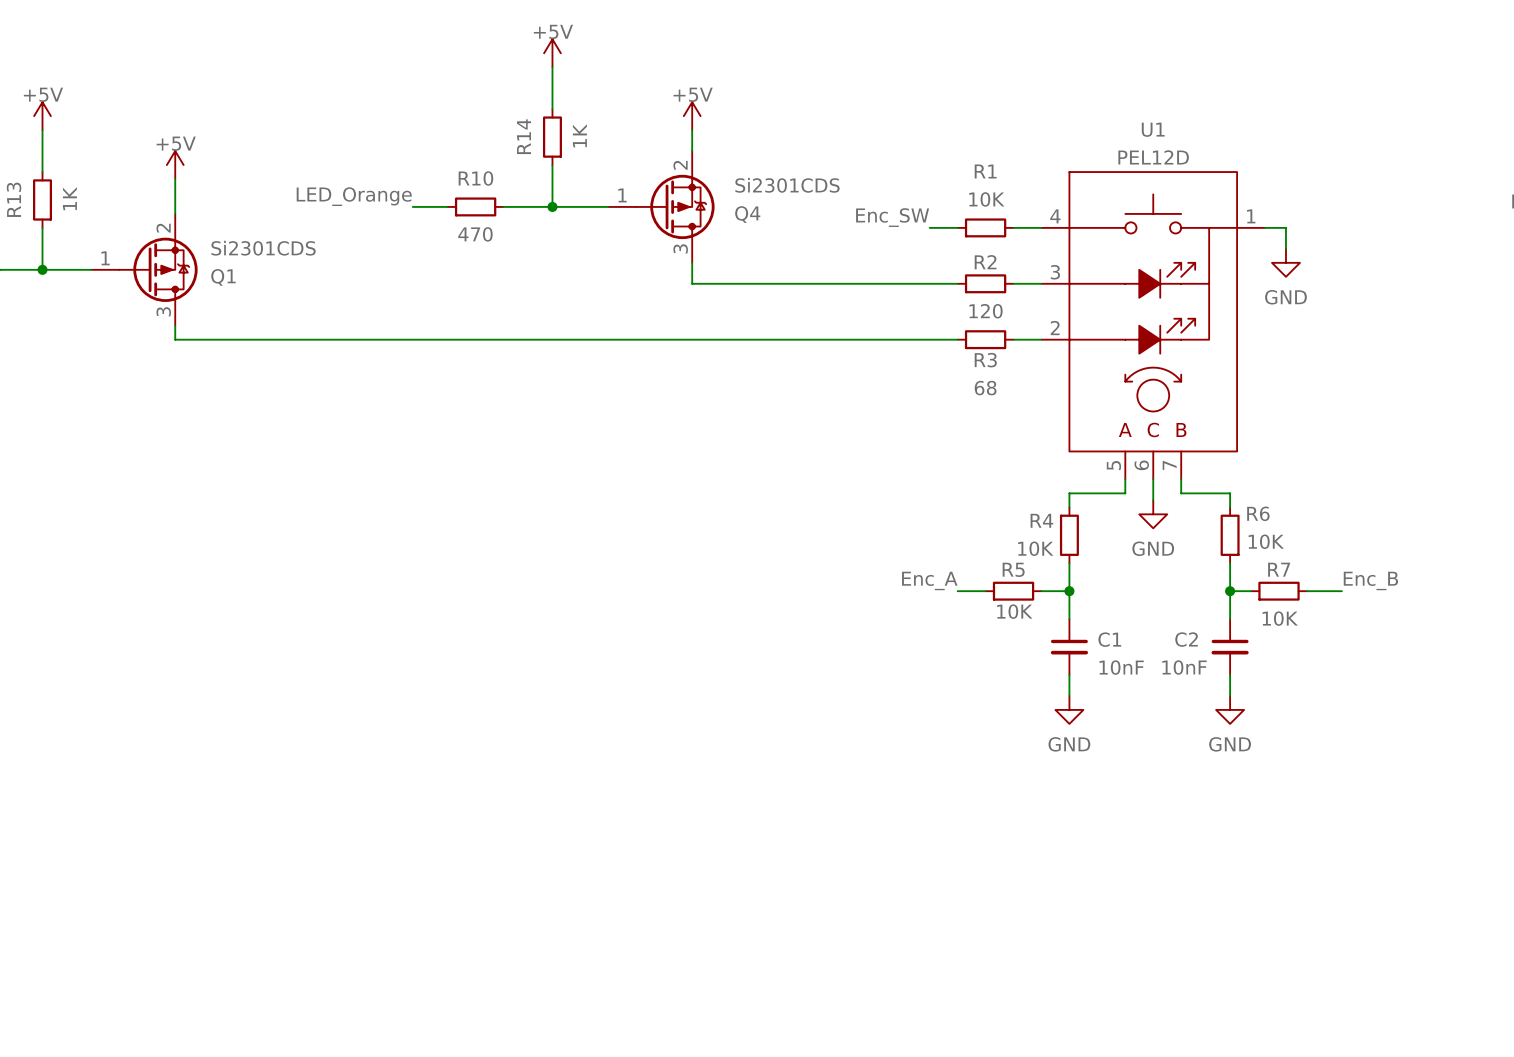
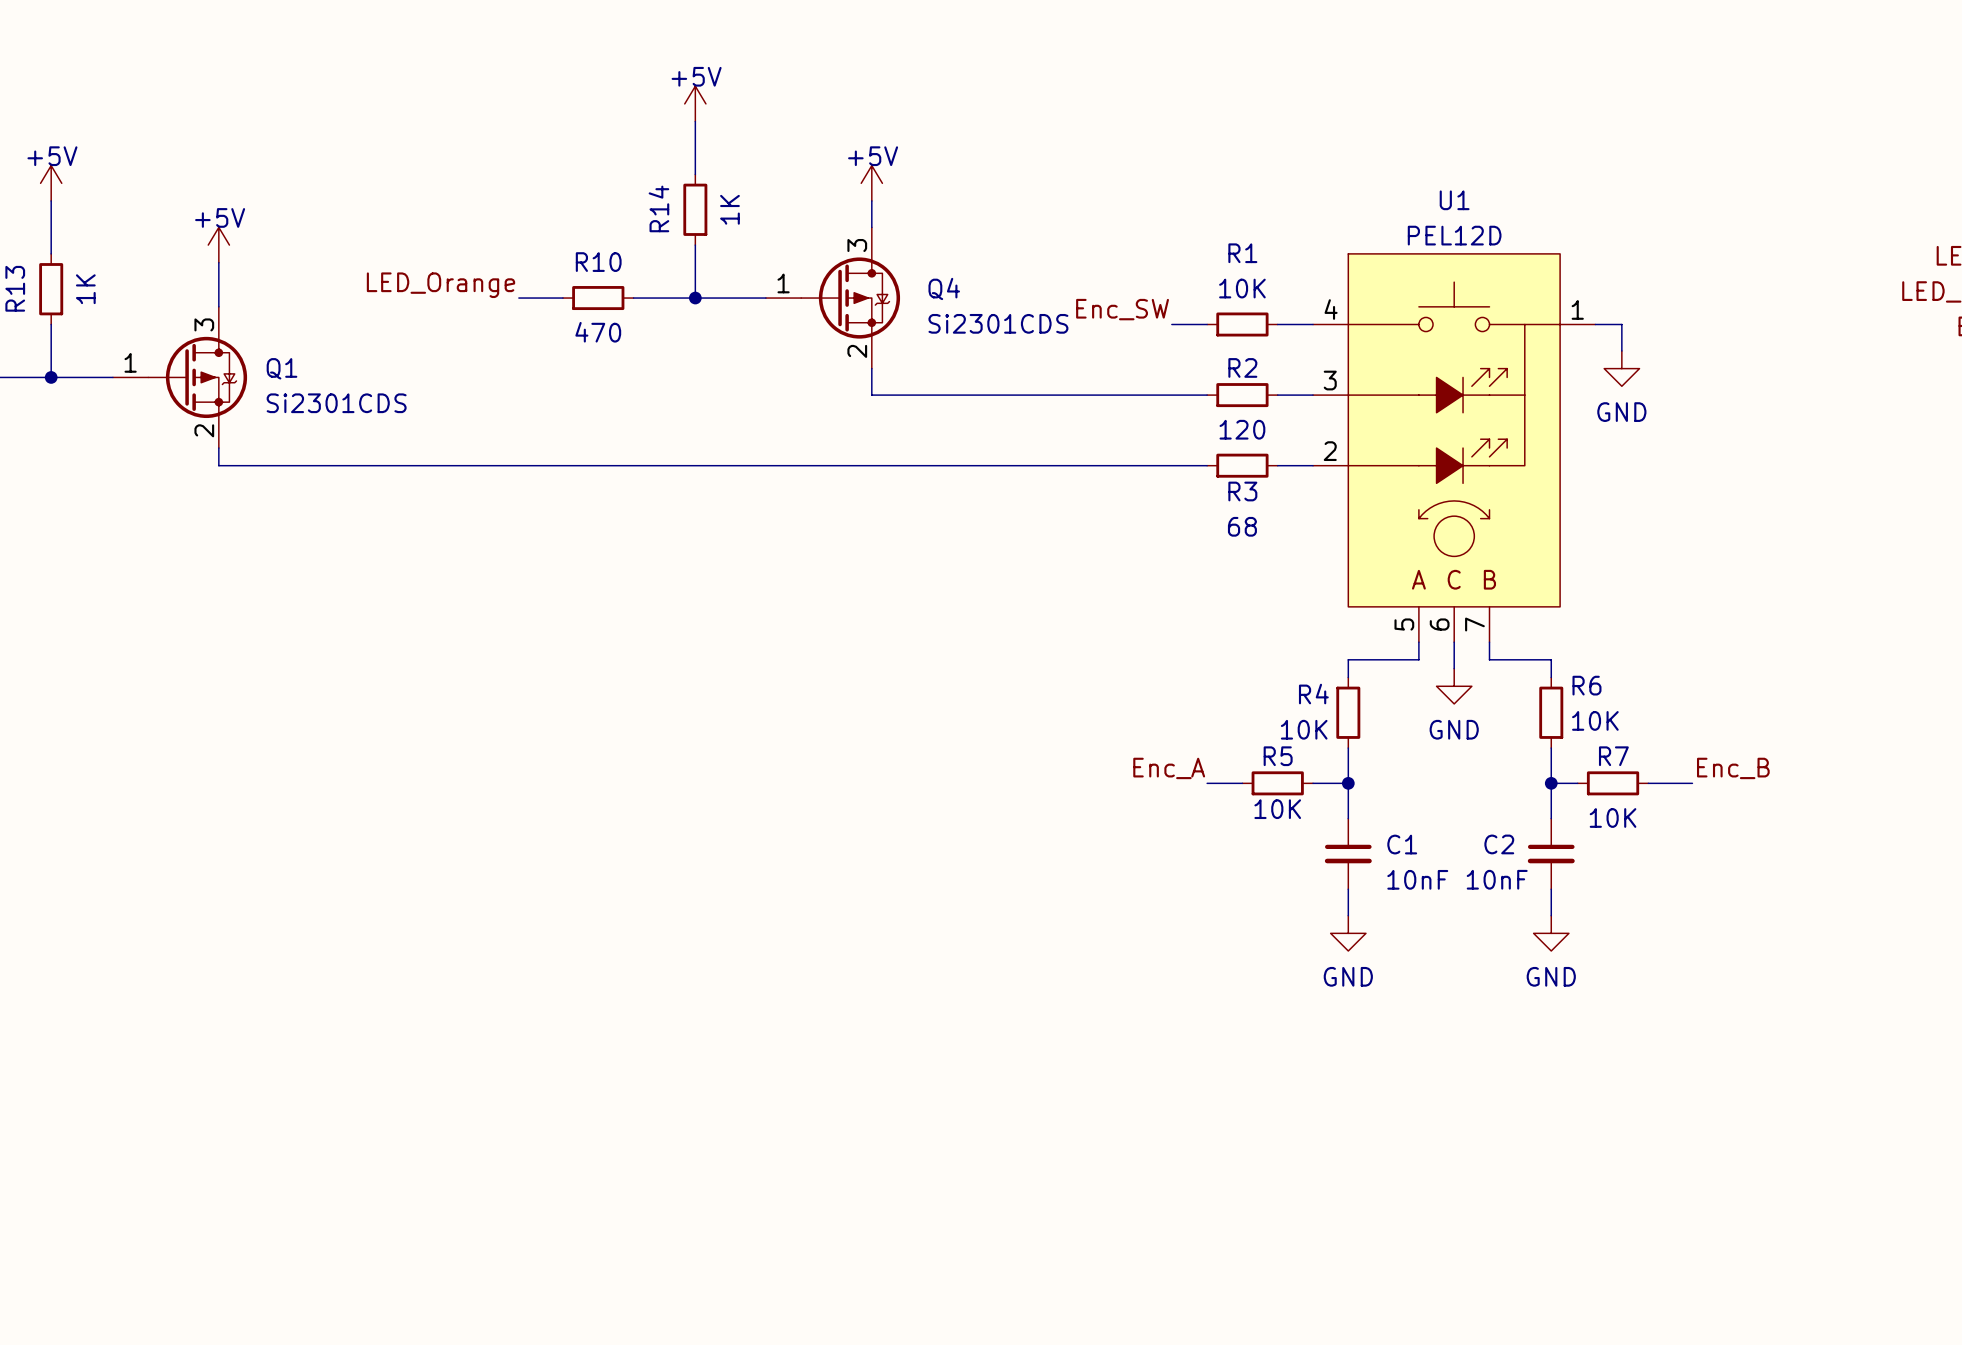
Q4 flip: as is (675, 206) -> up-down (850, 298)
Q1 flip: as is (158, 269) -> up-down (197, 377)

